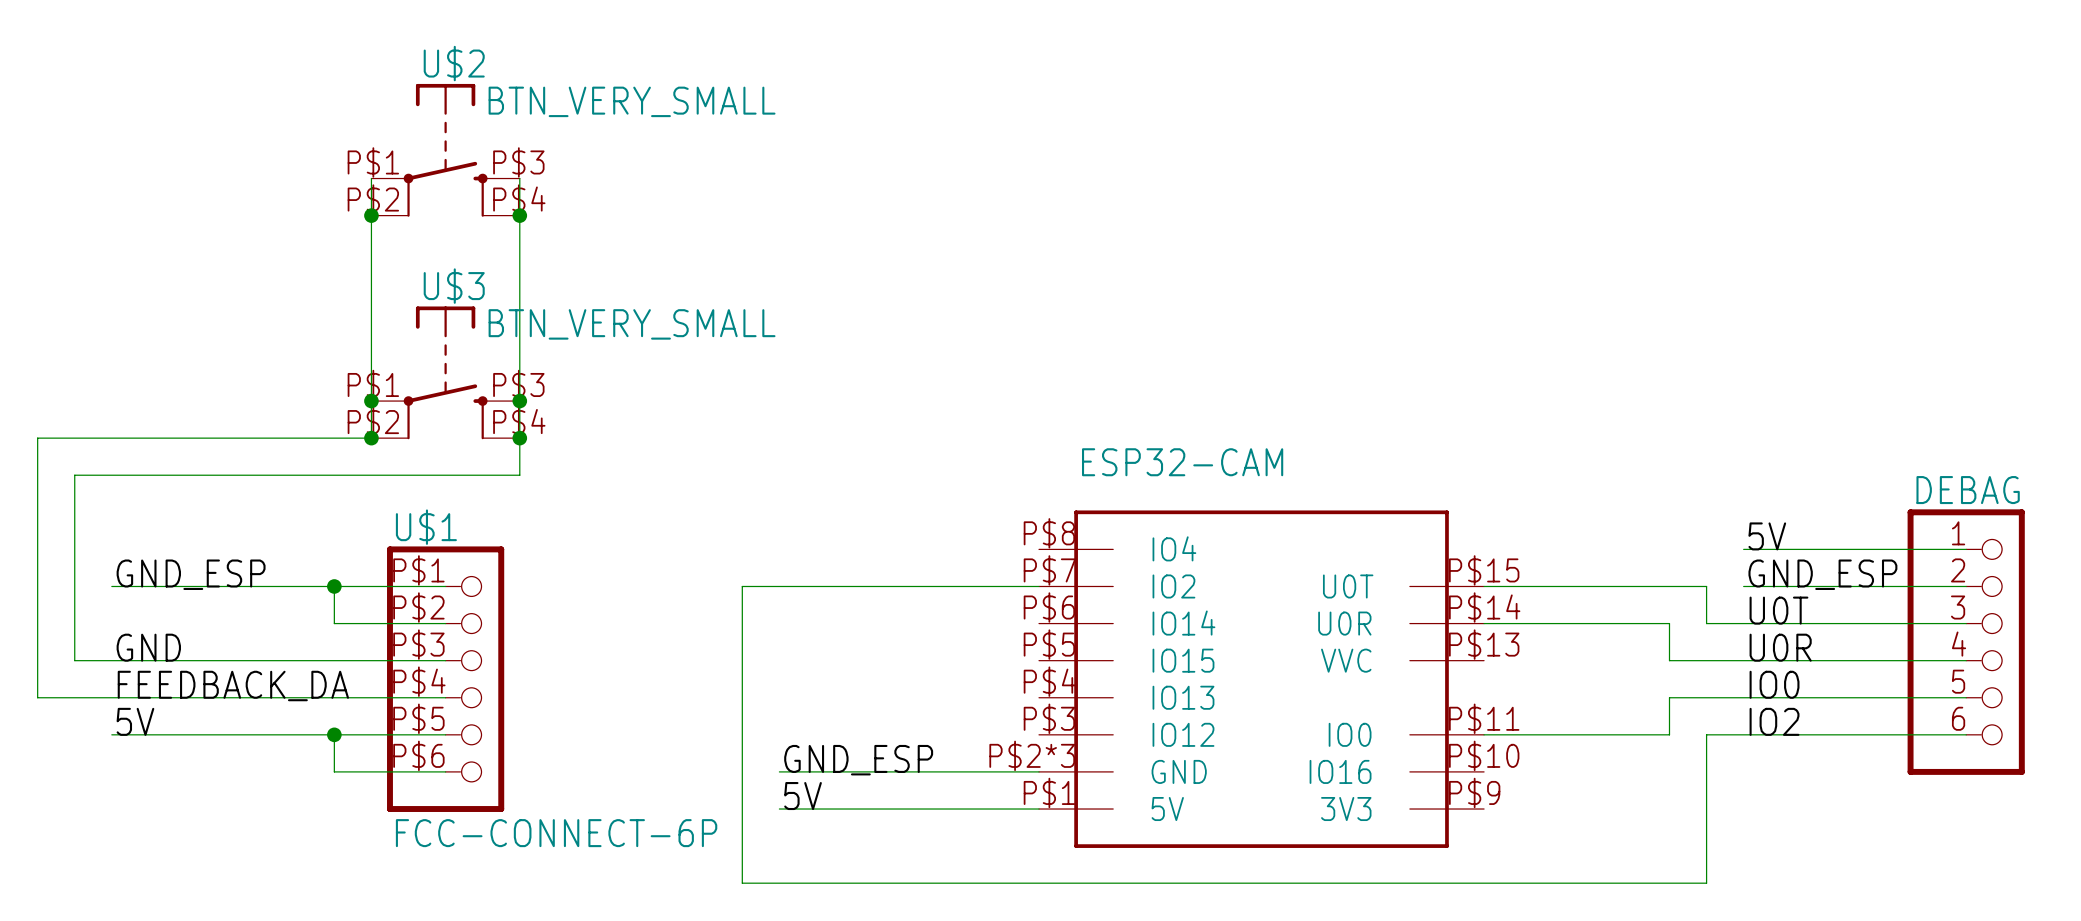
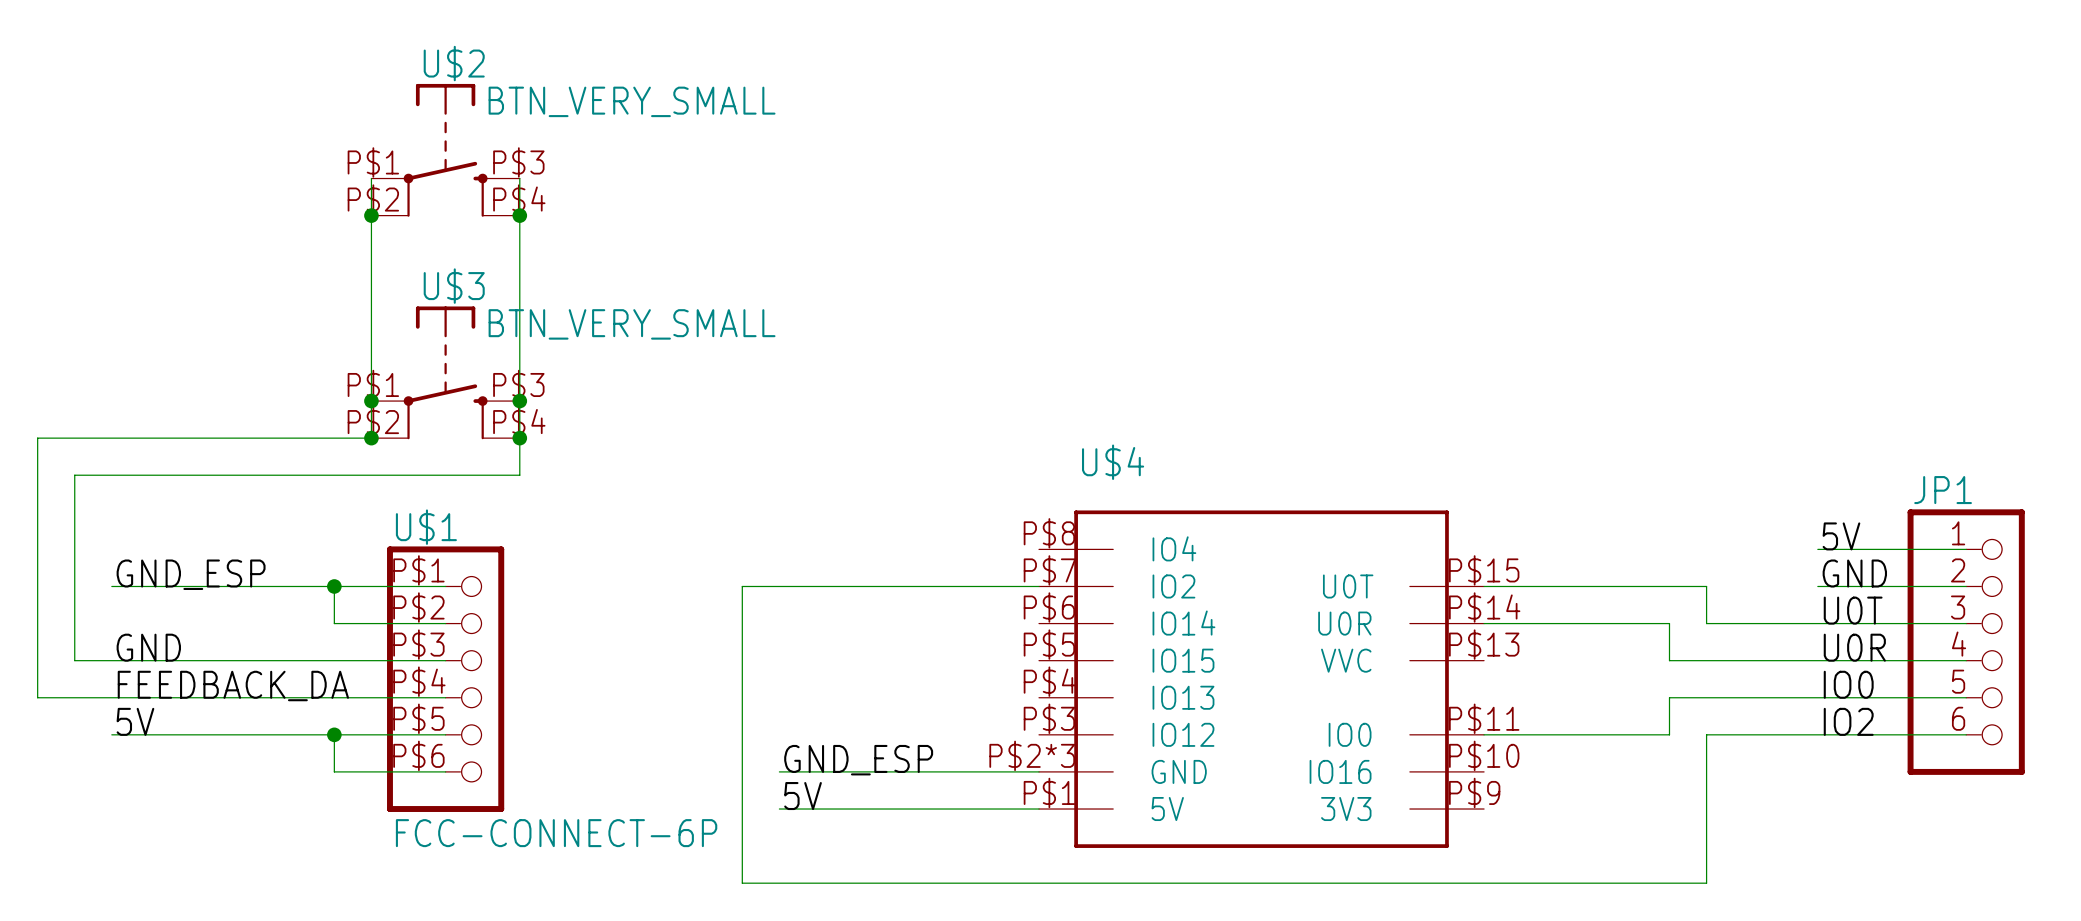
ESP32-CAM name: ESP32-CAM (1182, 462) -> U$4 (1113, 462)
DEBAG name: DEBAG (1968, 490) -> JP1 (1943, 490)
label position: 5V (1767, 536) -> 5V (1841, 536)
wire: (1743, 549) (1817, 549) -> none
label: none -> GND (1854, 573)
label: GND_ESP (1822, 574) -> none
wire: (1743, 586) (1817, 586) -> none
label position: U0T (1778, 610) -> U0T (1853, 610)
label position: U0R (1780, 647) -> U0R (1854, 647)
label position: IO0 (1774, 684) -> IO0 (1848, 684)
label position: IO2 (1774, 721) -> IO2 (1848, 721)

